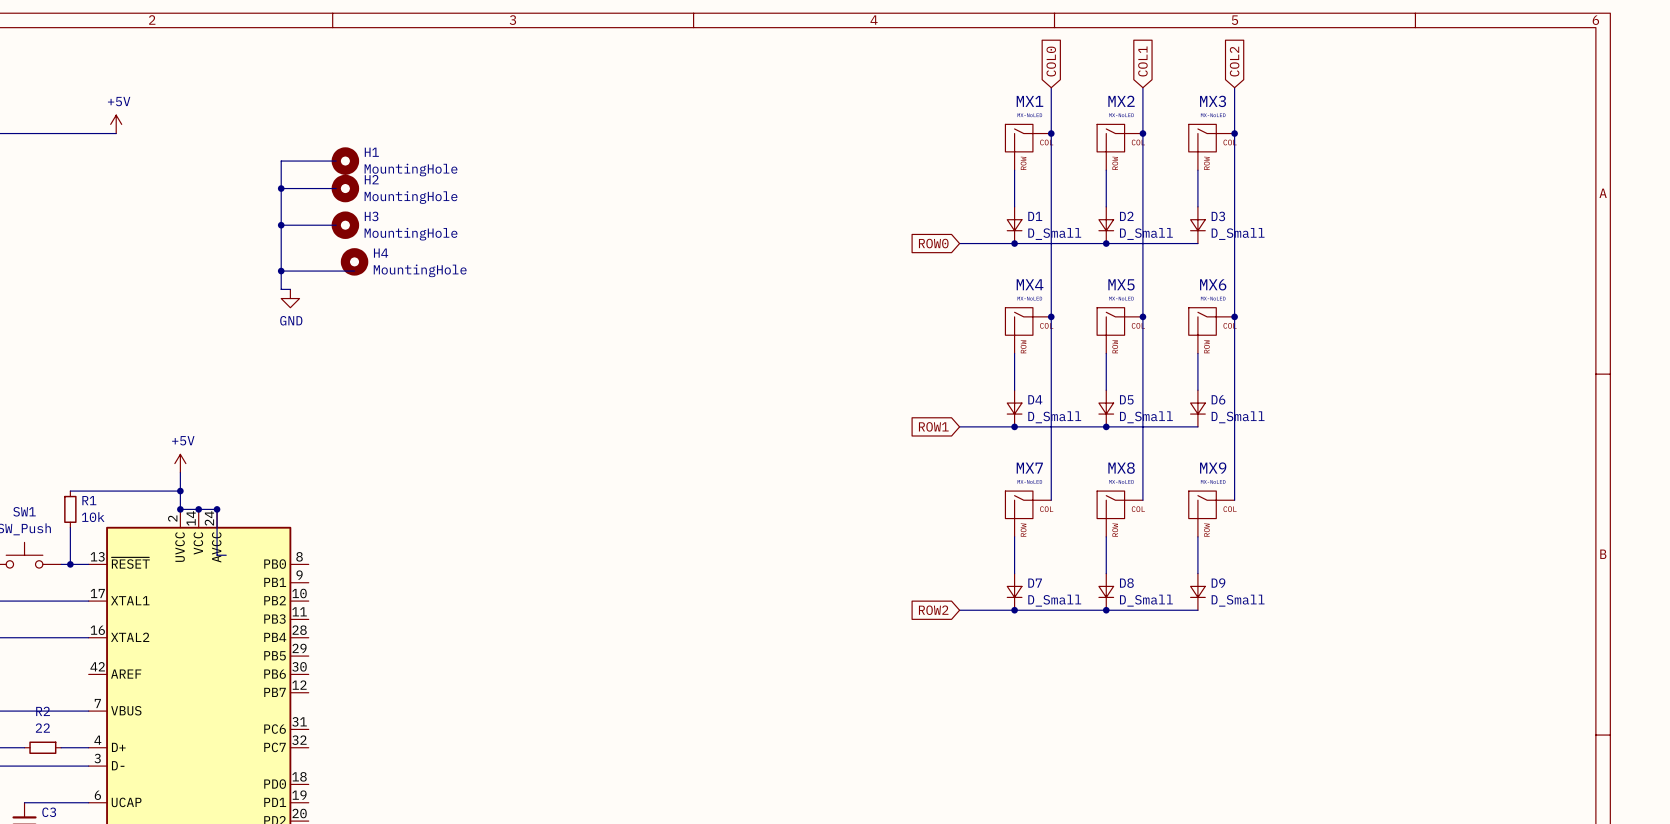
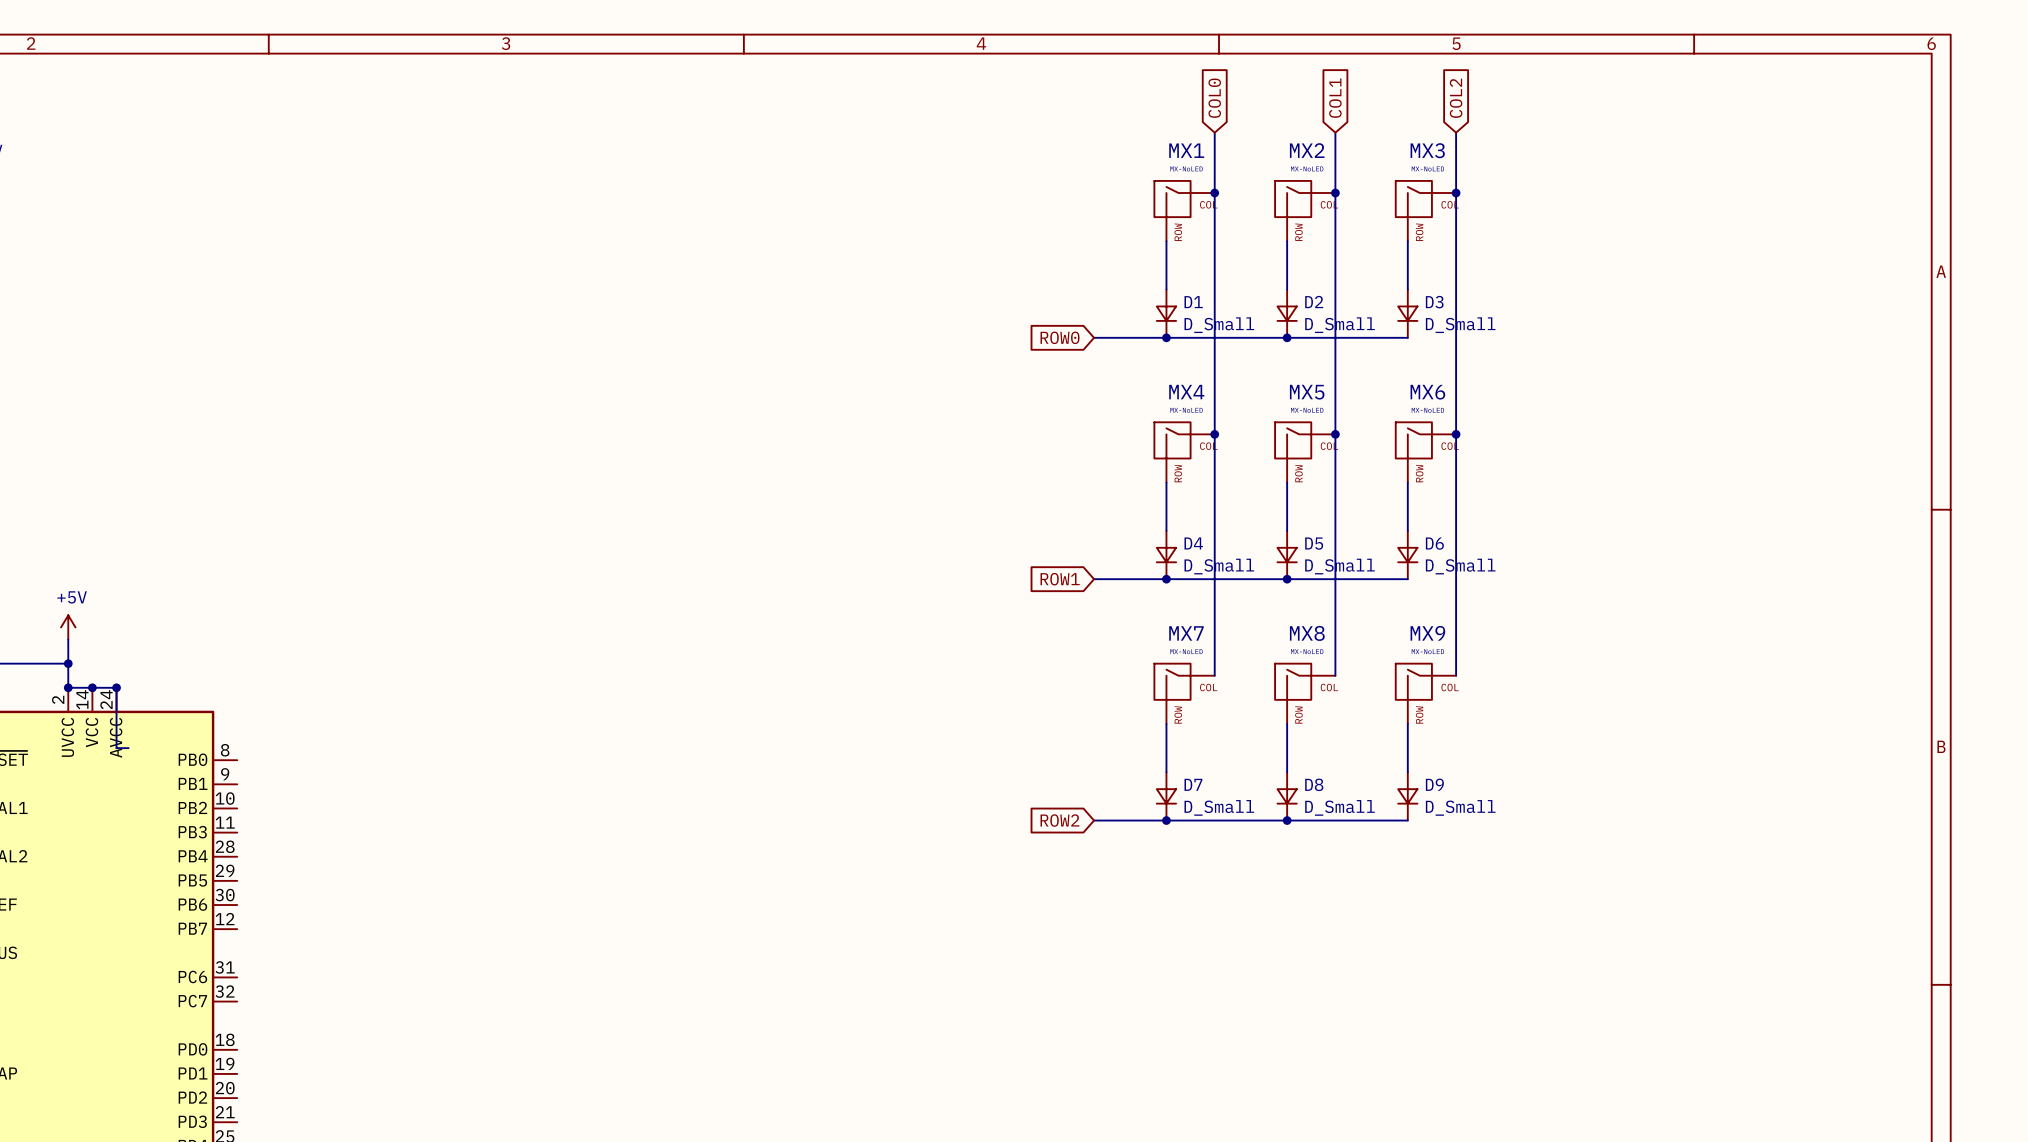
wire: (336, 161) (281, 161) (281, 289) (290, 289) -> none
H1: MountingHole (345, 161) -> none
wire: (281, 188) (336, 188) -> none
junction: (281, 188) -> none
H2: MountingHole (345, 188) -> none
wire: (281, 225) (336, 225) -> none
junction: (281, 225) -> none
H3: MountingHole (345, 225) -> none
H4: MountingHole (354, 261) -> none
wire: (281, 271) (354, 271) -> none
junction: (281, 271) -> none
power symbol: GND (290, 298) -> none

